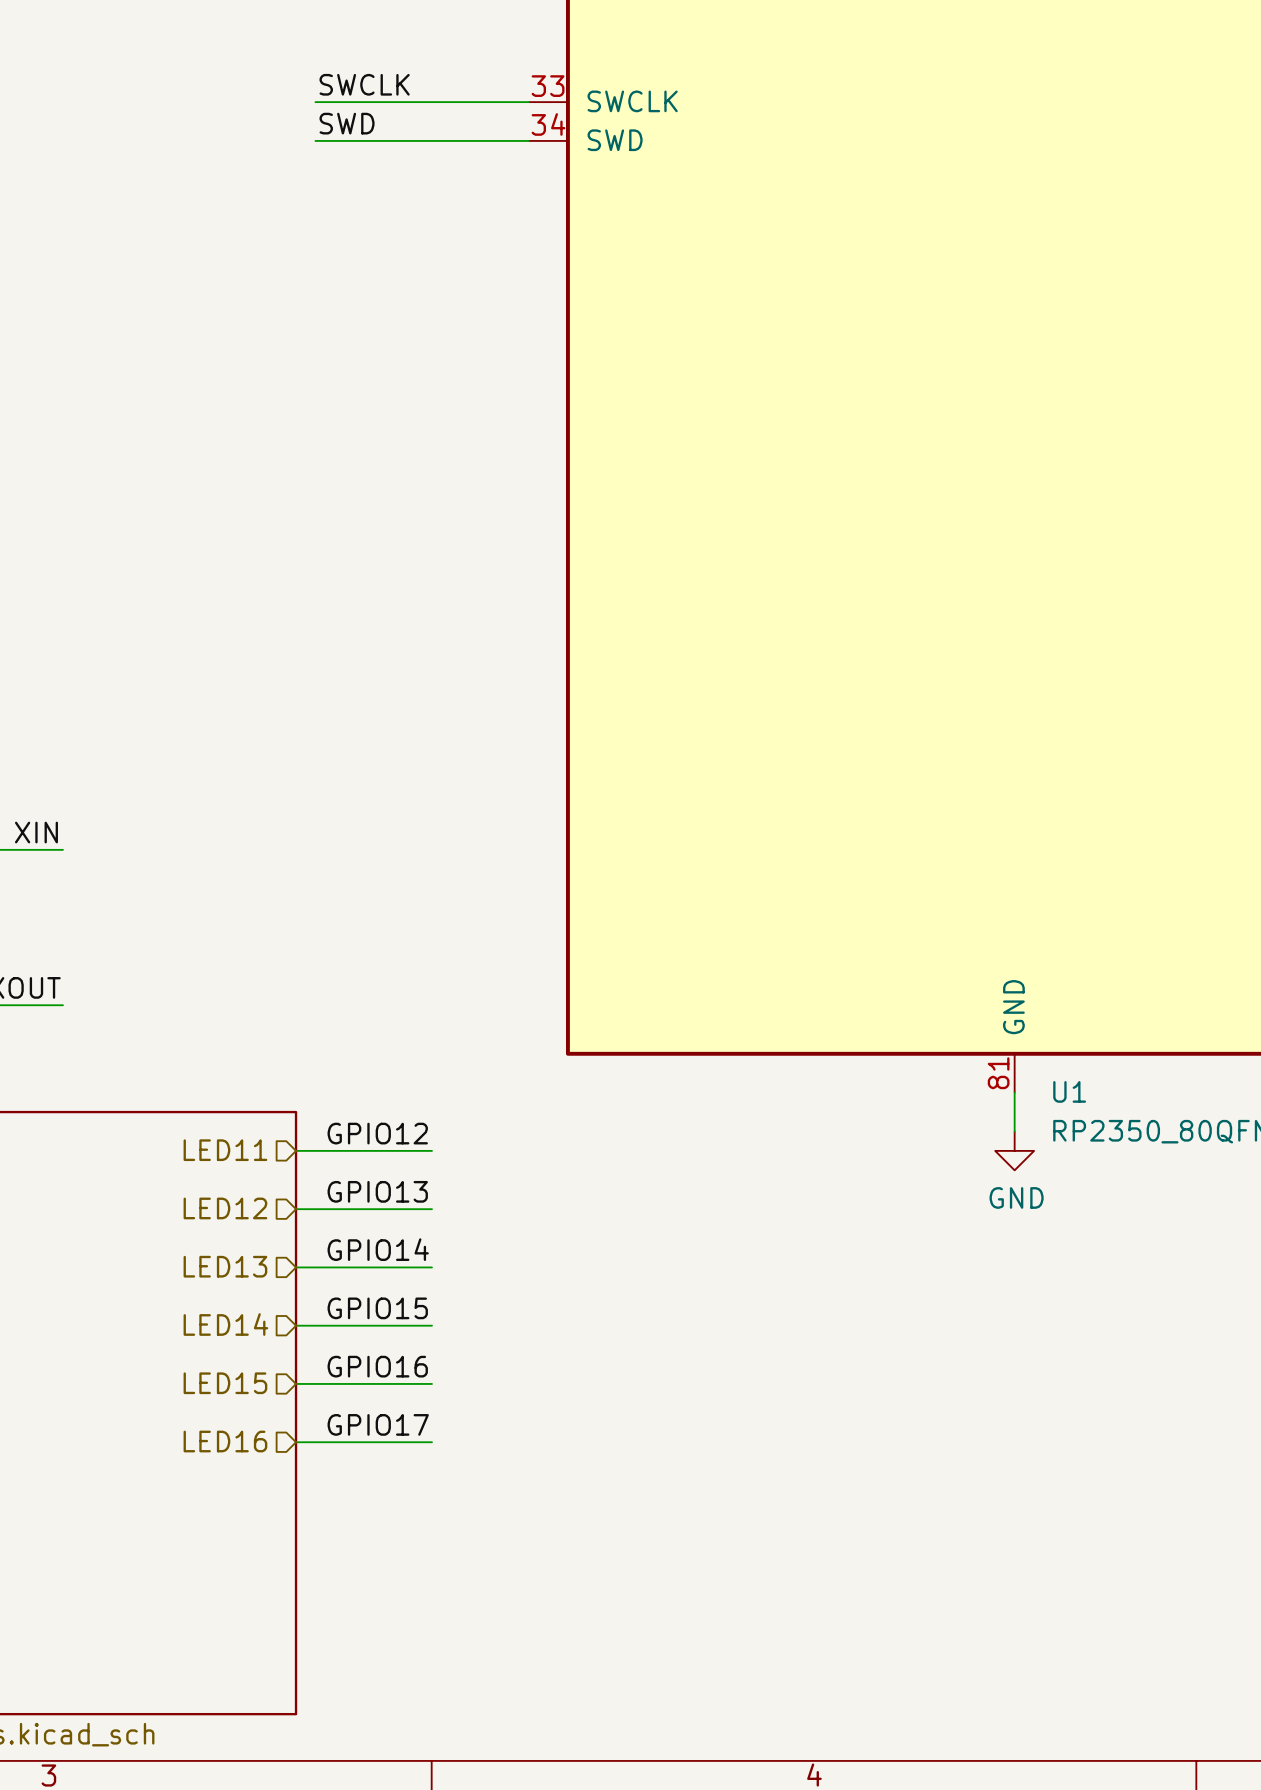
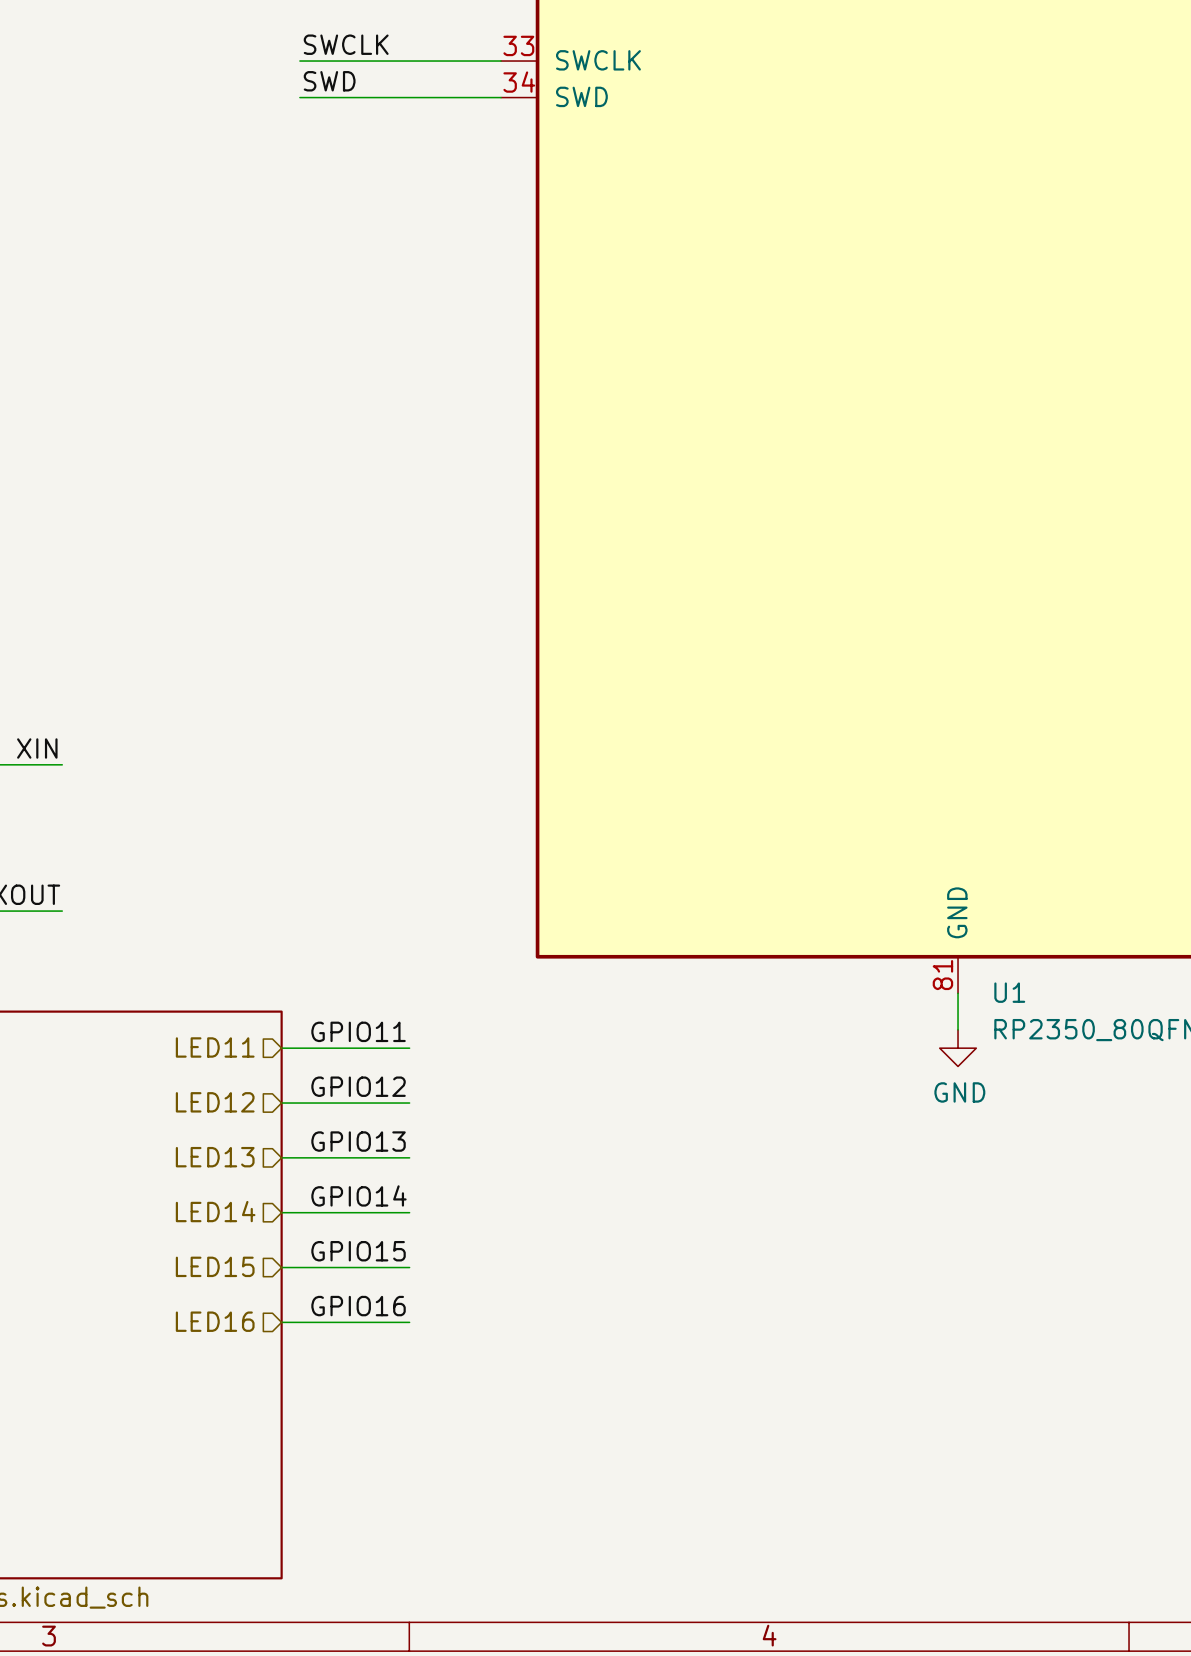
label: GPIO12 (377, 1133) -> GPIO11 (358, 1031)
label: GPIO13 (377, 1191) -> GPIO12 (358, 1086)
label: GPIO14 (378, 1249) -> GPIO13 (358, 1141)
label: GPIO15 (377, 1308) -> GPIO14 (358, 1195)
label: GPIO16 (377, 1366) -> GPIO15 (358, 1251)
label: GPIO17 (378, 1424) -> GPIO16 (358, 1306)

